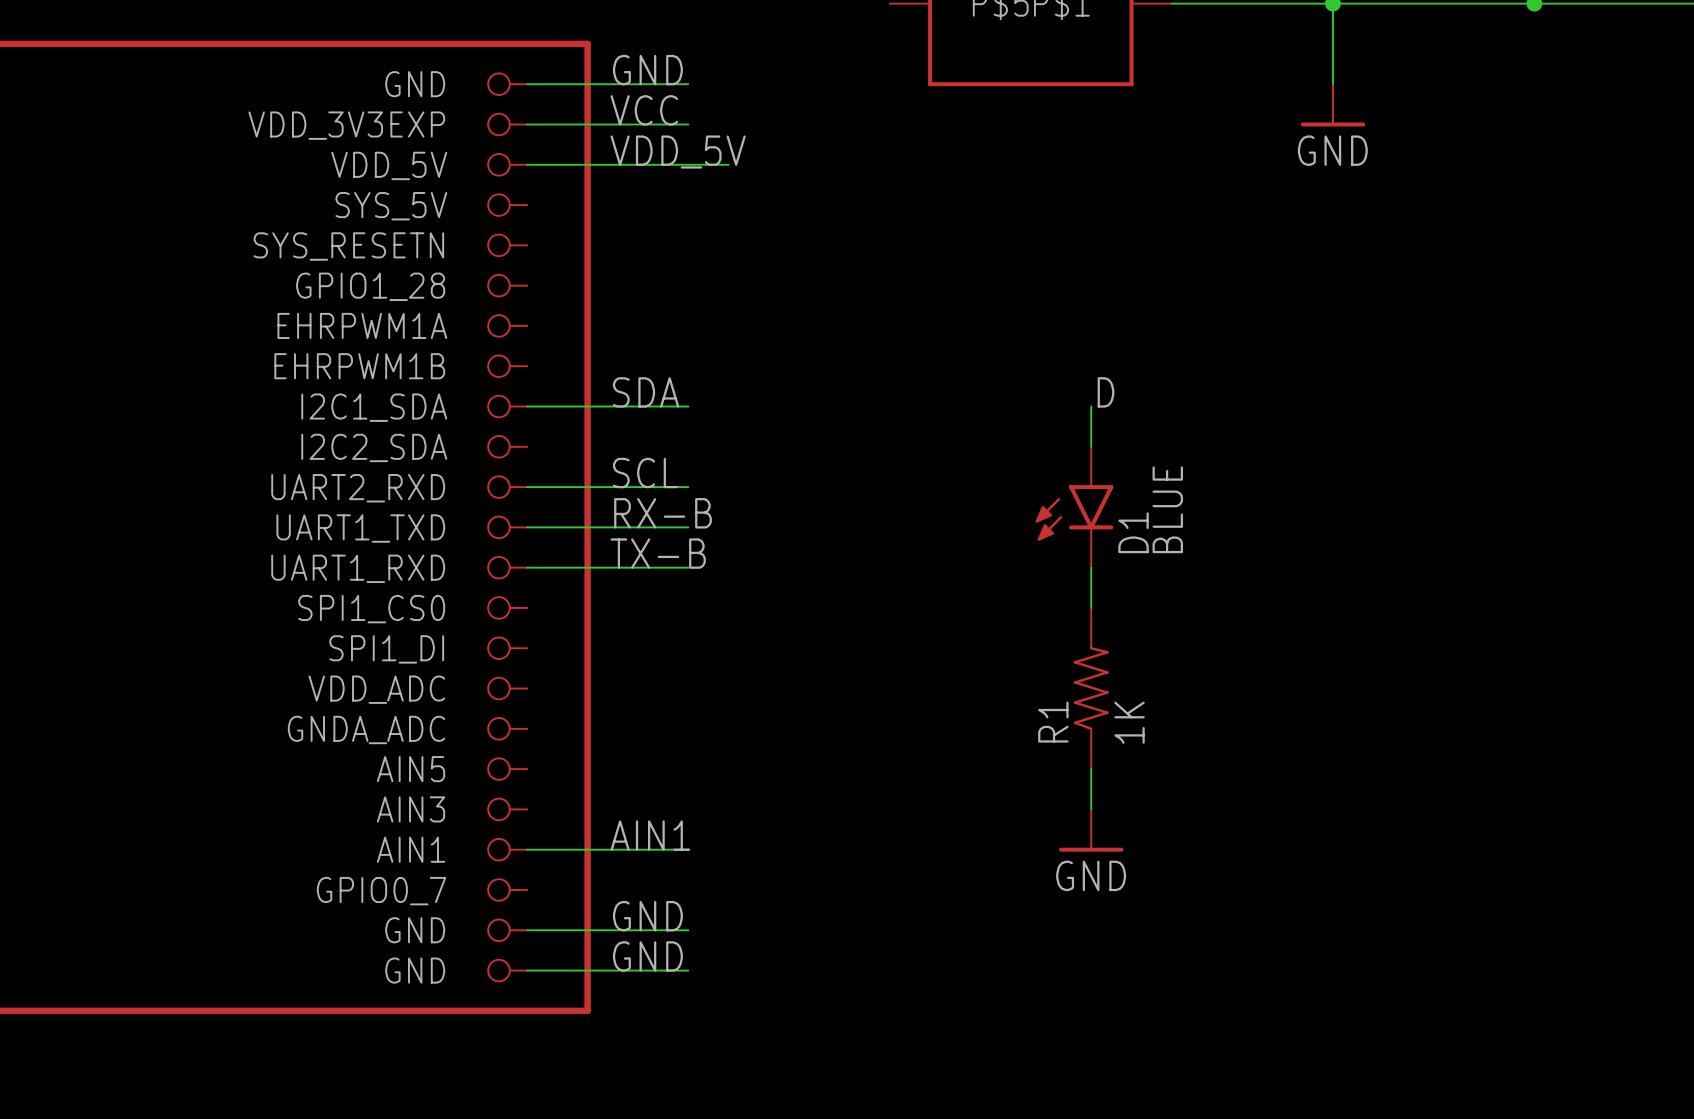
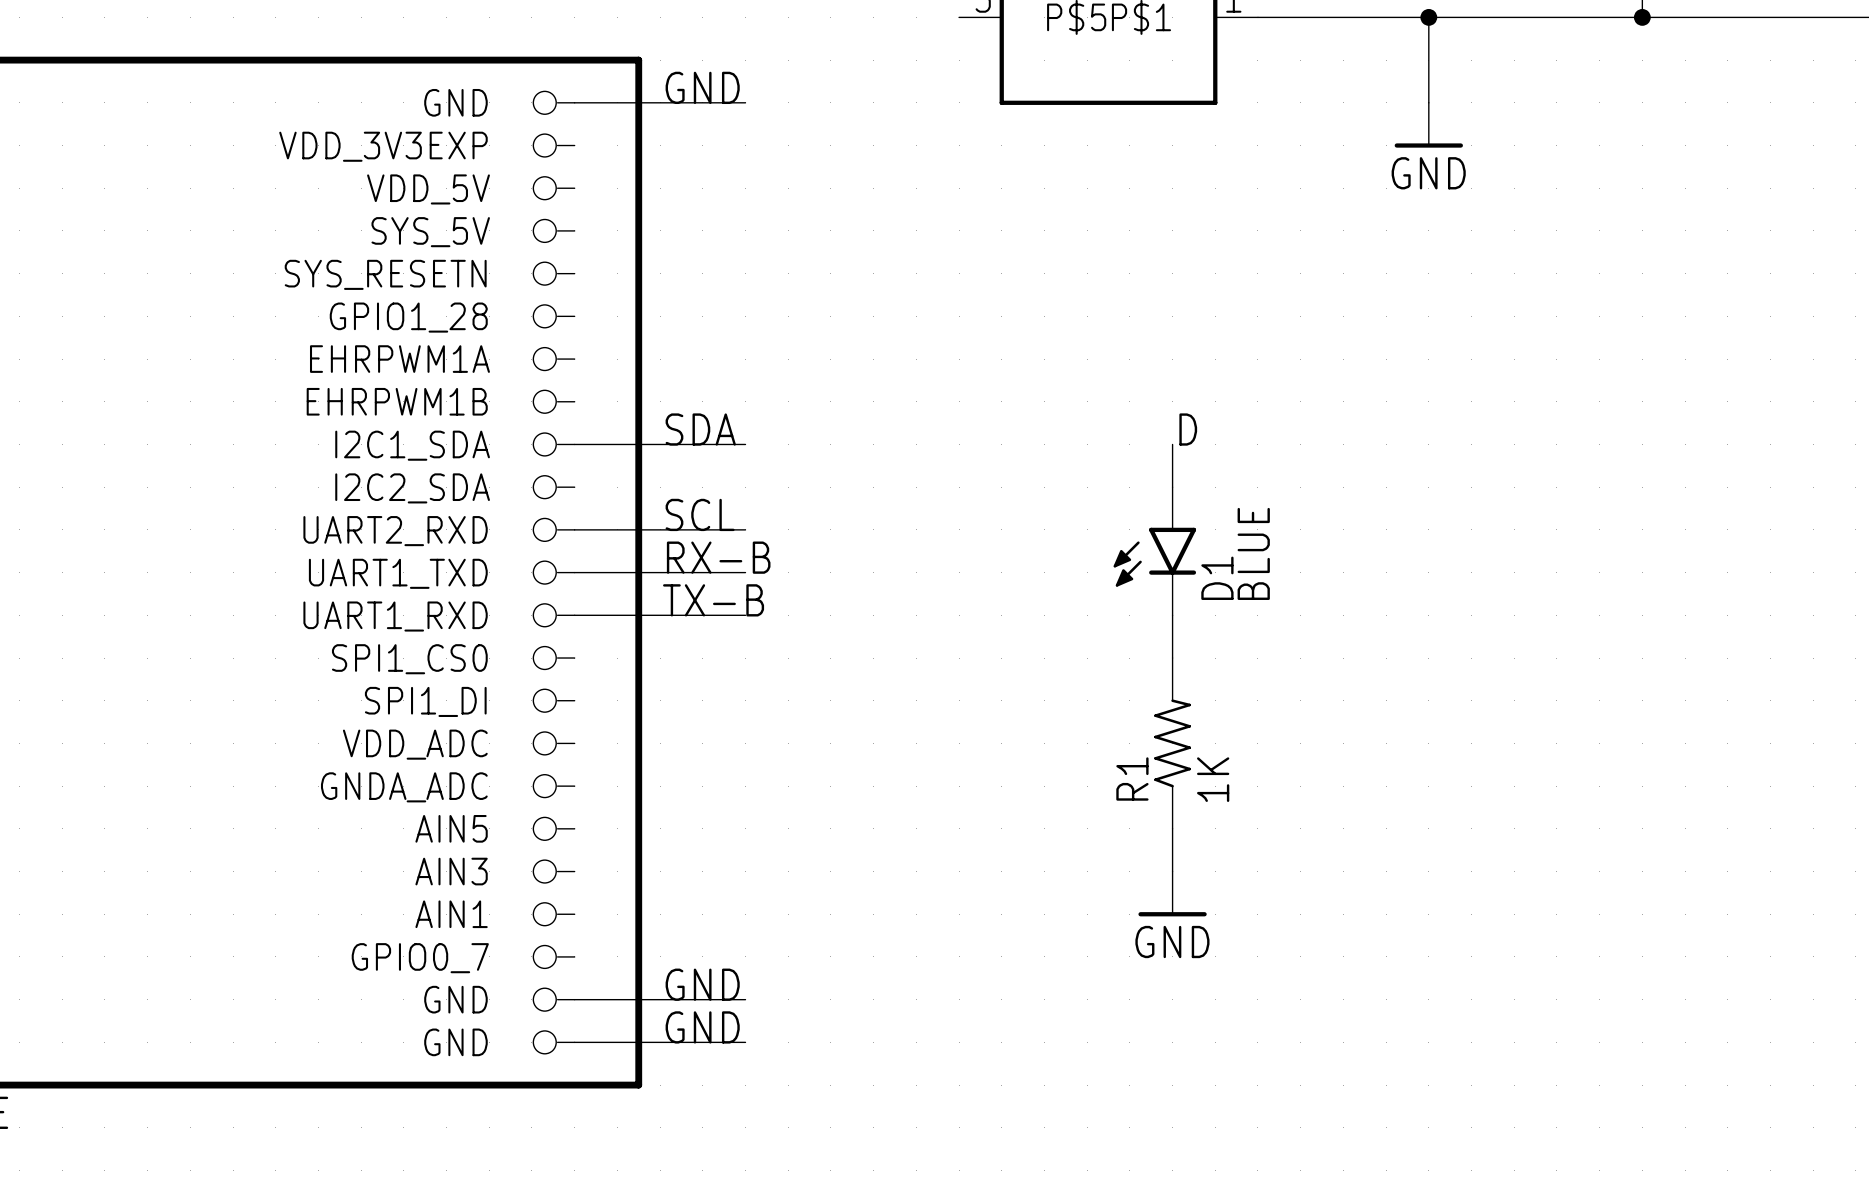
label: VCC (644, 110) -> none
wire: (527, 124) (688, 124) -> none
label: VDD_5V (678, 152) -> none
wire: (527, 164) (728, 164) -> none
label: AIN1 (650, 835) -> none
wire: (527, 849) (688, 849) -> none

